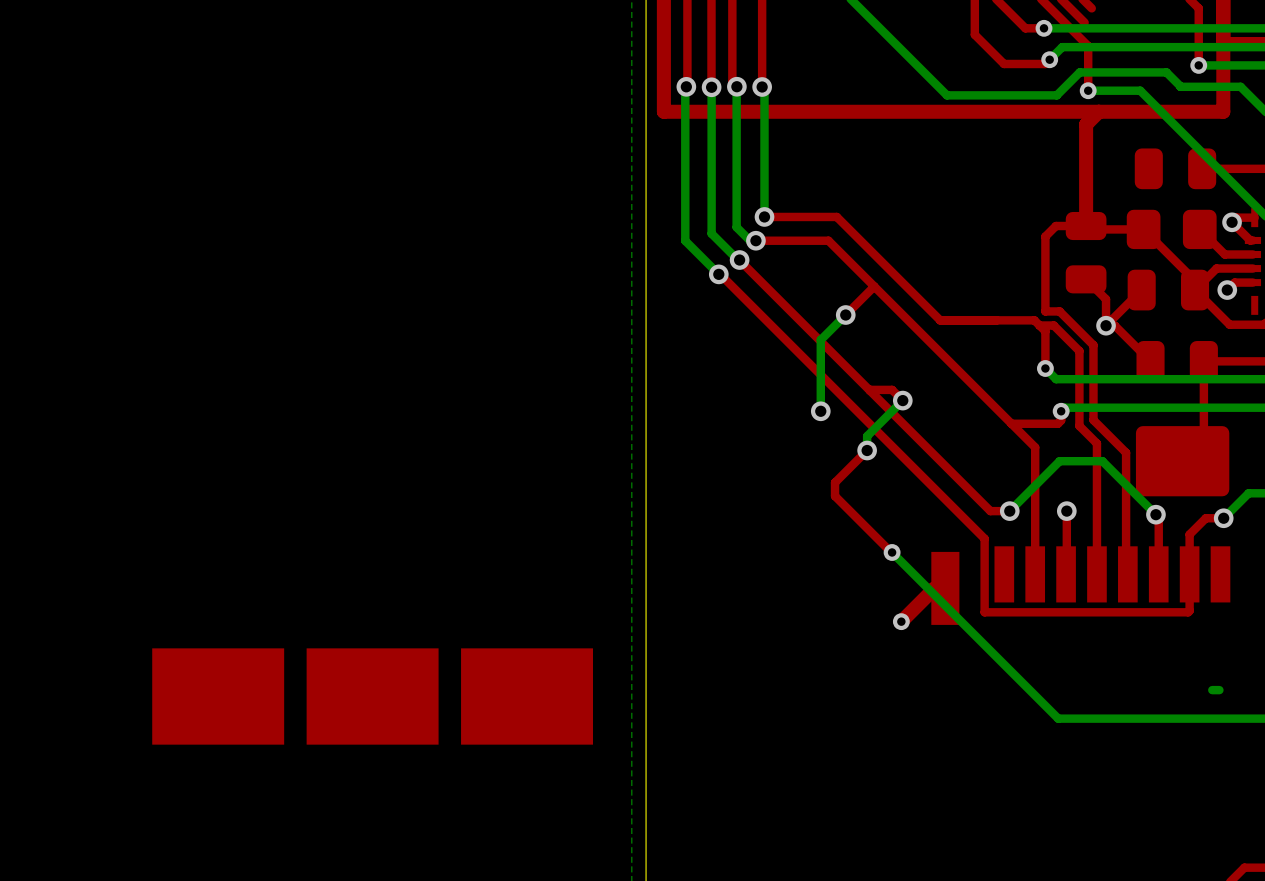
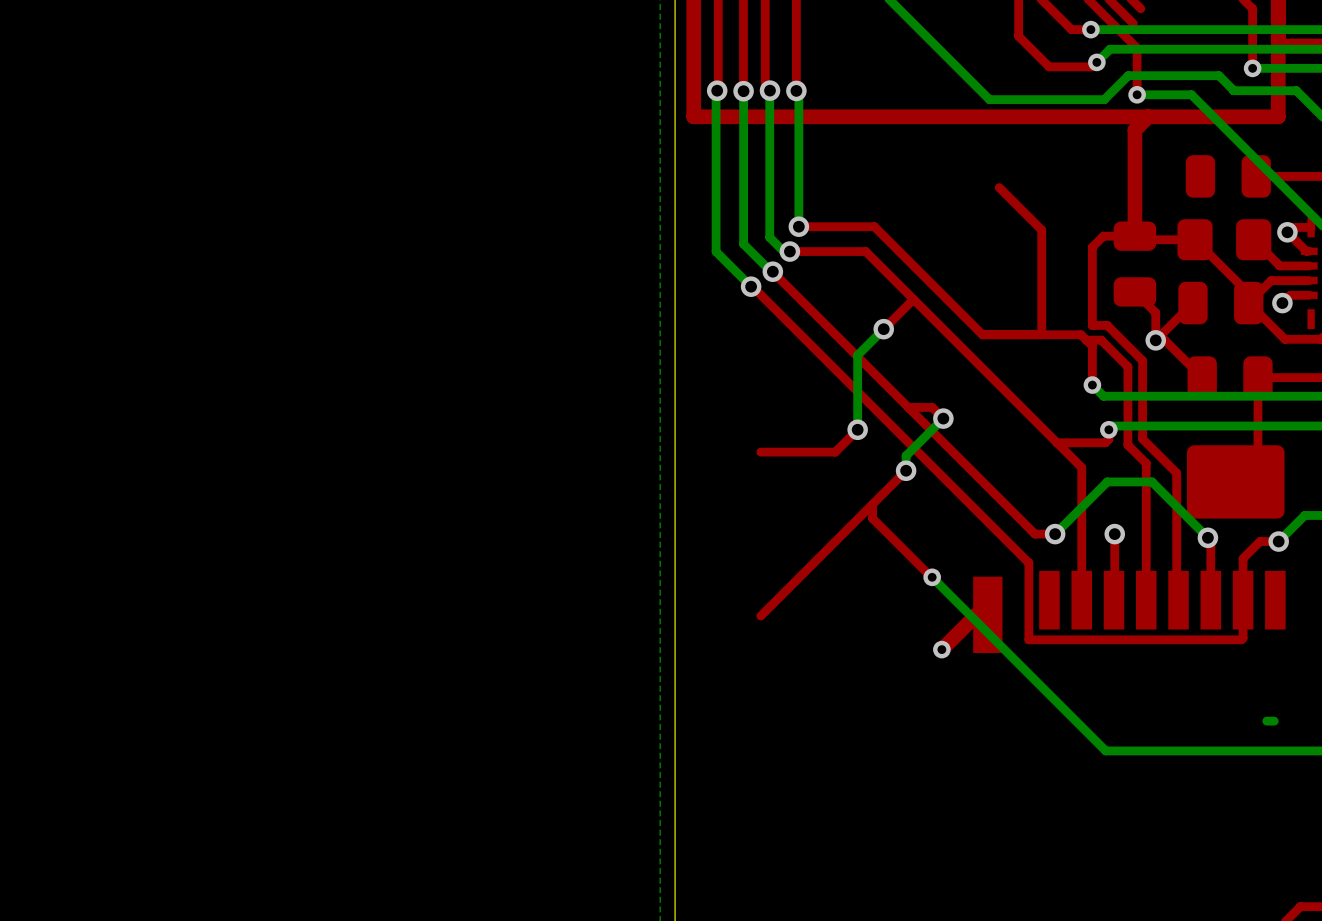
top track: none -> (999, 187) (1041, 230) (1041, 334)
top track: none -> (857, 429) (835, 452) (760, 452)
top track: none -> (872, 504) (760, 616)
part: (218, 696) -> none
part: (372, 696) -> none
part: (527, 696) -> none

